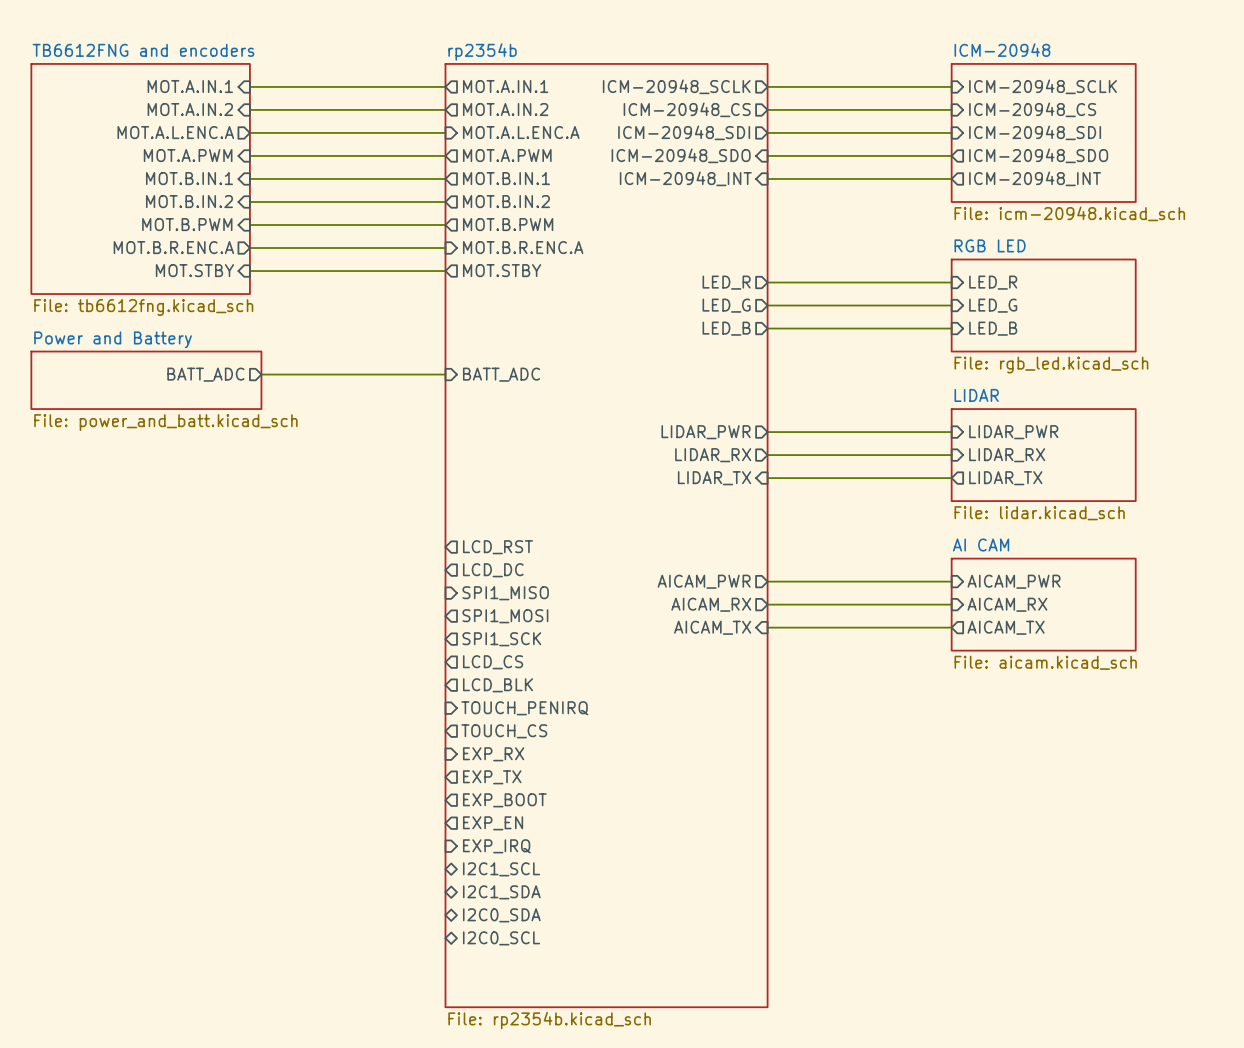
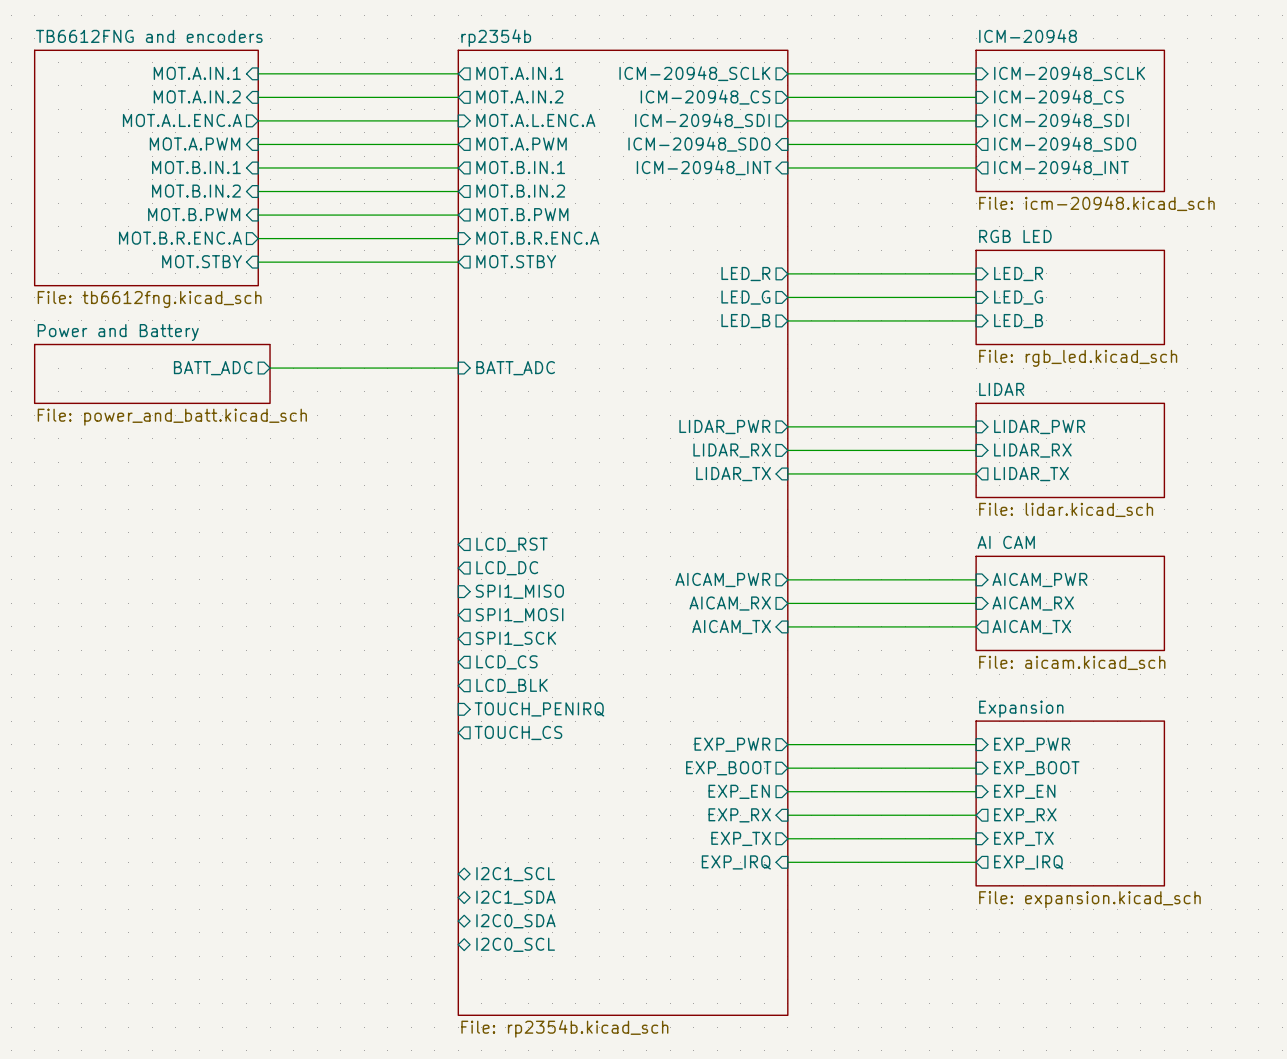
sheet pin: none -> EXP_PWR (732, 744)
wire: none -> (787, 744) (976, 744)
sheet pin: none -> EXP_PWR (1032, 744)
sheet pin: EXP_RX (493, 754) -> none
sheet pin: none -> EXP_BOOT (728, 768)
wire: none -> (787, 768) (976, 768)
sheet pin: none -> EXP_BOOT (1036, 768)
sheet pin: EXP_TX (492, 777) -> none
sheet pin: none -> EXP_EN (739, 791)
wire: none -> (787, 791) (976, 791)
sheet pin: none -> EXP_EN (1024, 791)
sheet pin: EXP_BOOT (504, 800) -> none
sheet Expansion: none -> File: expansion.kicad_sch (1070, 803)
sheet pin: none -> EXP_RX (739, 815)
wire: none -> (787, 815) (976, 815)
sheet pin: none -> EXP_RX (1025, 815)
sheet pin: EXP_EN (493, 823) -> none
sheet pin: none -> EXP_TX (741, 838)
wire: none -> (787, 838) (976, 838)
sheet pin: none -> EXP_TX (1023, 838)
sheet pin: EXP_IRQ (496, 846) -> none
sheet pin: none -> EXP_IRQ (736, 862)
wire: none -> (787, 862) (976, 862)
sheet pin: none -> EXP_IRQ (1028, 862)

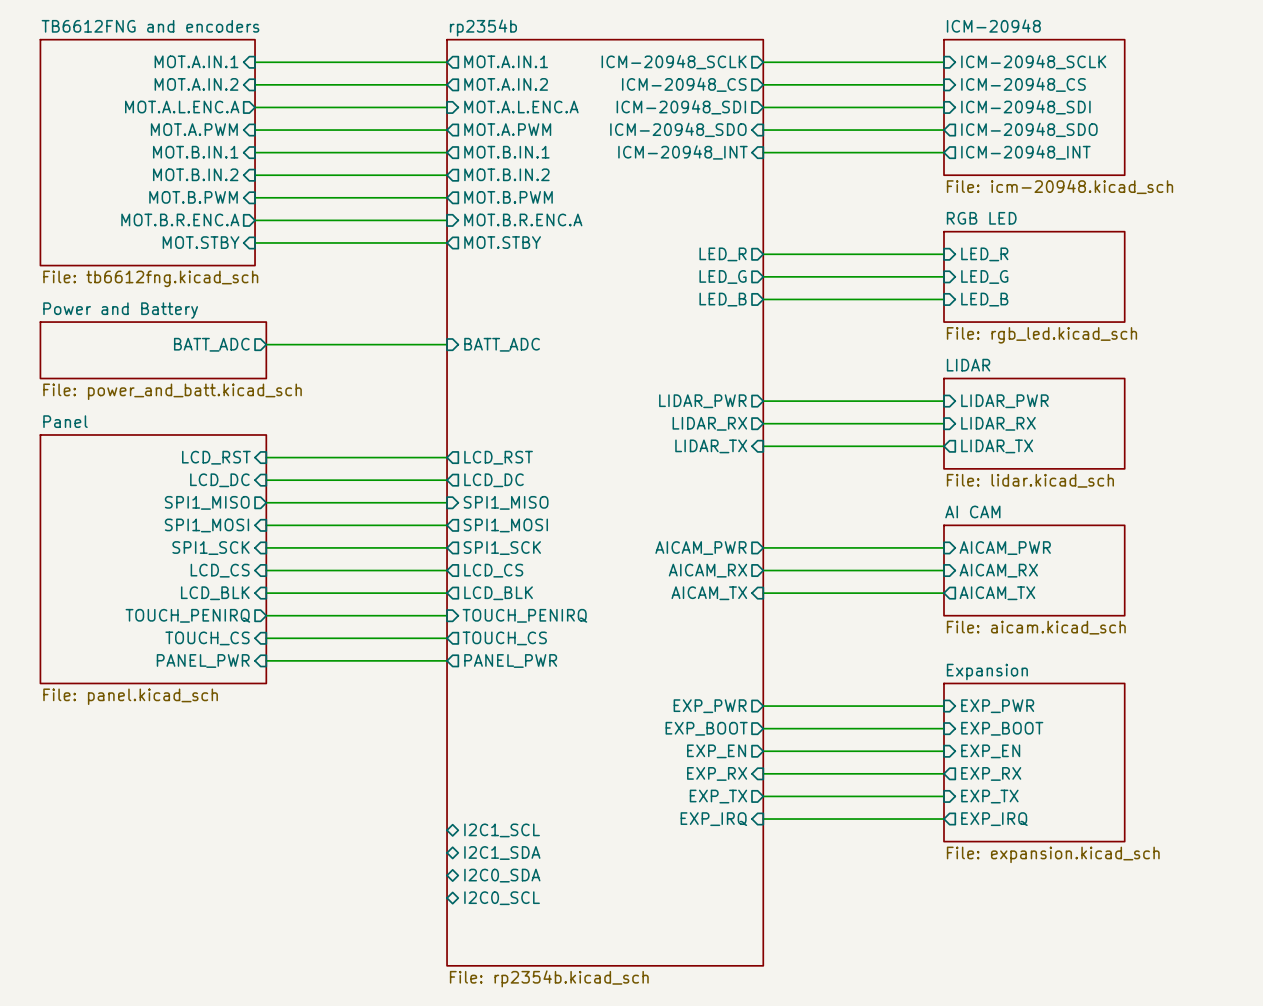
sheet pin: none -> LCD_RST (216, 457)
wire: none -> (266, 457) (447, 457)
sheet pin: none -> LCD_DC (219, 480)
wire: none -> (266, 480) (447, 480)
sheet pin: none -> SPI1_MISO (207, 502)
wire: none -> (266, 502) (447, 502)
sheet pin position: LCD_RST (512, 544) -> LCD_RST (498, 457)
sheet pin: none -> SPI1_MOSI (206, 525)
wire: none -> (266, 525) (447, 525)
sheet pin position: LCD_DC (507, 568) -> LCD_DC (494, 480)
sheet pin: none -> SPI1_SCK (211, 548)
wire: none -> (266, 547) (447, 547)
sheet Panel: none -> File: panel.kicad_sch (153, 559)
sheet pin position: SPI1_MISO (519, 591) -> SPI1_MISO (506, 502)
sheet pin: none -> LCD_CS (220, 570)
wire: none -> (266, 570) (447, 570)
sheet pin position: SPI1_MOSI (519, 615) -> SPI1_MOSI (505, 525)
wire: none -> (266, 593) (447, 593)
sheet pin: none -> LCD_BLK (215, 593)
sheet pin position: SPI1_SCK (515, 638) -> SPI1_SCK (502, 548)
sheet pin: none -> TOUCH_PENIRQ (187, 615)
wire: none -> (266, 615) (447, 615)
sheet pin position: LCD_CS (506, 662) -> LCD_CS (493, 570)
sheet pin: none -> TOUCH_CS (207, 638)
wire: none -> (266, 638) (447, 638)
sheet pin position: LCD_BLK (512, 685) -> LCD_BLK (498, 593)
sheet pin: none -> PANEL_PWR (203, 661)
wire: none -> (266, 660) (447, 660)
sheet pin: none -> PANEL_PWR (510, 661)
sheet pin position: TOUCH_PENIRQ (539, 709) -> TOUCH_PENIRQ (524, 615)
sheet pin position: TOUCH_CS (518, 732) -> TOUCH_CS (504, 638)

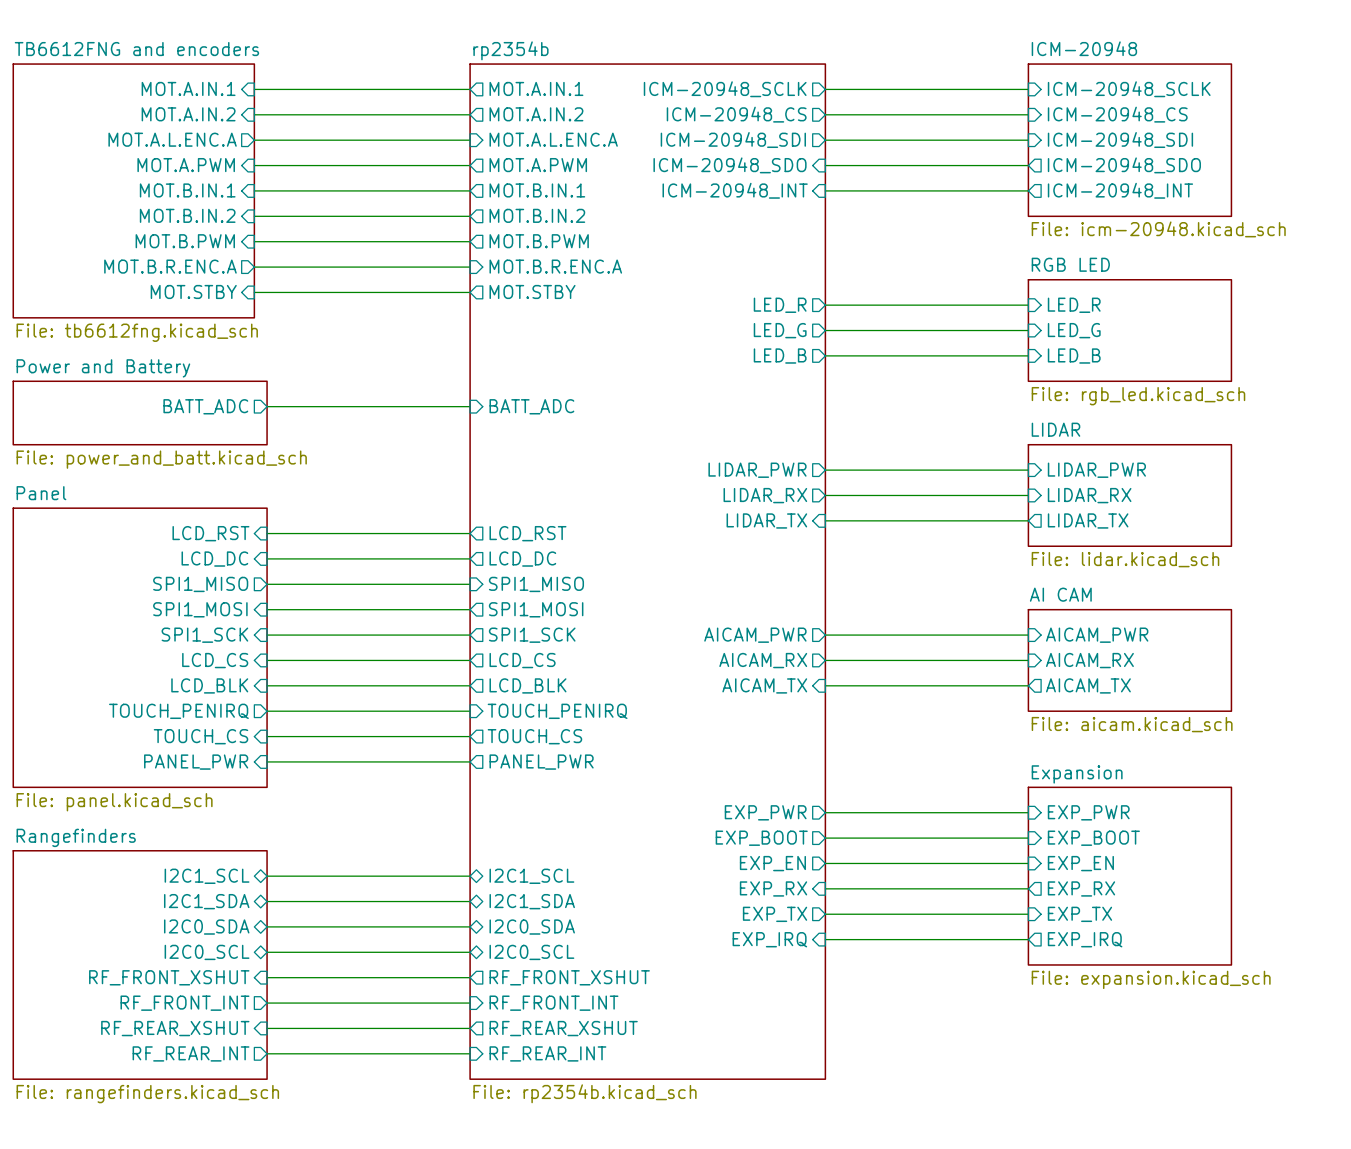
sheet rp2354b shape: [446, 39, 764, 967] -> [469, 63, 827, 1080]
sheet pin: none -> I2C1_SCL (207, 876)
wire: none -> (267, 876) (470, 876)
sheet pin: none -> I2C1_SCL (531, 876)
sheet pin: none -> I2C1_SDA (206, 901)
wire: none -> (267, 901) (470, 901)
sheet pin: none -> I2C1_SDA (532, 901)
sheet pin: none -> I2C0_SDA (206, 927)
wire: none -> (267, 926) (470, 926)
sheet pin: none -> I2C0_SDA (532, 927)
sheet pin: none -> I2C0_SCL (207, 952)
wire: none -> (267, 952) (470, 952)
sheet pin: I2C1_SCL (502, 830) -> I2C0_SCL (531, 952)
sheet Rangefinders: none -> File: rangefinders.kicad_sch (140, 964)
wire: none -> (267, 977) (470, 977)
sheet pin: none -> RF_FRONT_XSHUT (169, 977)
sheet pin shape: bidirectional (502, 853) -> output (569, 977)
sheet pin: I2C1_SDA (502, 853) -> RF_FRONT_XSHUT (569, 977)
sheet pin: none -> RF_FRONT_INT (184, 1003)
wire: none -> (267, 1003) (470, 1003)
sheet pin shape: bidirectional (502, 875) -> input (553, 1003)
sheet pin: I2C0_SDA (502, 875) -> RF_FRONT_INT (553, 1003)
sheet pin: none -> RF_REAR_XSHUT (175, 1028)
wire: none -> (267, 1028) (470, 1028)
sheet pin shape: bidirectional (502, 898) -> output (563, 1028)
sheet pin: I2C0_SCL (502, 898) -> RF_REAR_XSHUT (563, 1028)
sheet pin: none -> RF_REAR_INT (191, 1053)
wire: none -> (267, 1053) (470, 1053)
sheet pin: none -> RF_REAR_INT (547, 1053)

